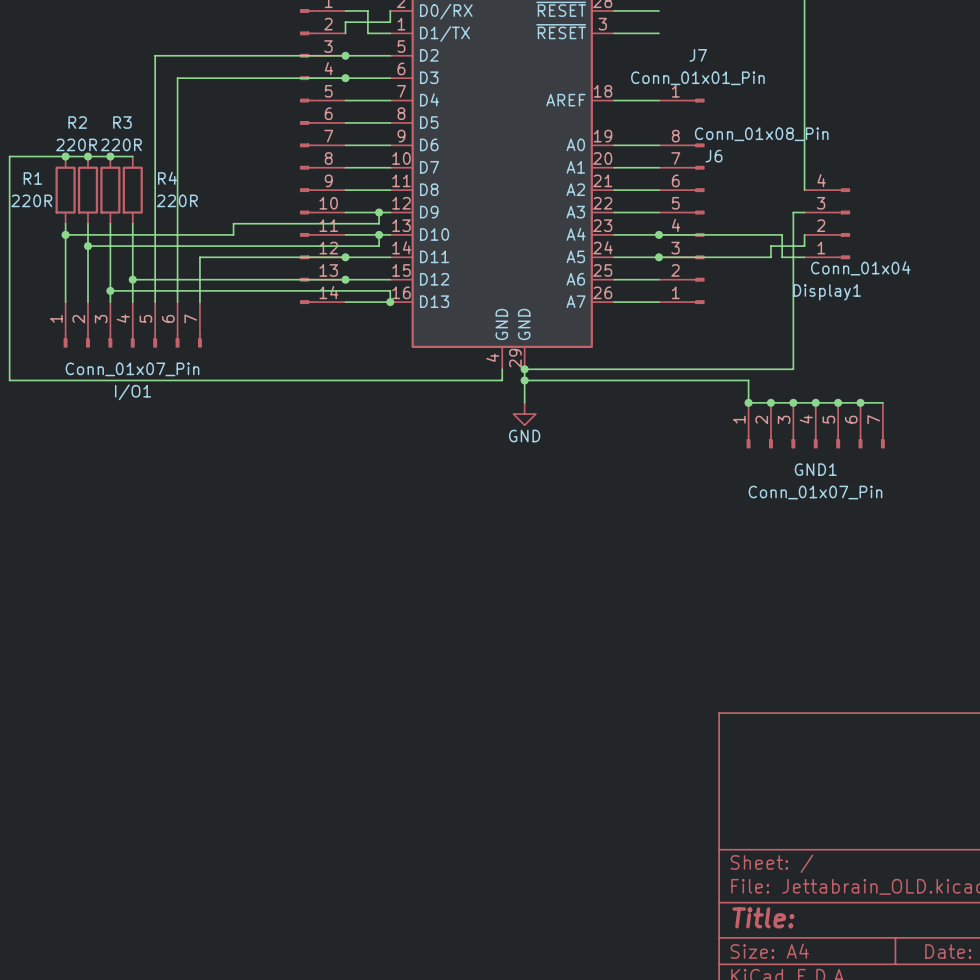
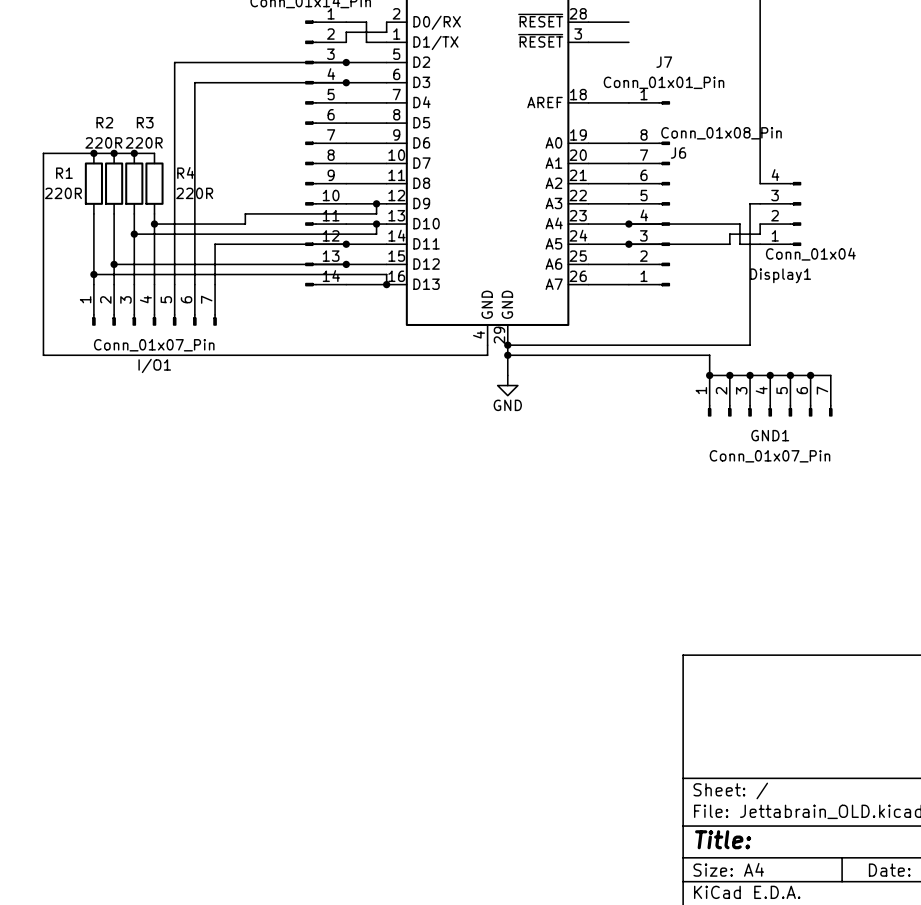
wire: (65, 234) (132, 234) -> none
junction: (65, 234) -> none
junction: none -> (154, 224)
wire: (87, 246) (110, 246) -> none
junction: (87, 246) -> none
junction: none -> (134, 234)
wire: none -> (114, 264) (154, 264)
junction: none -> (114, 264)
junction: (132, 279) -> none
wire: none -> (93, 274) (134, 274)
junction: none -> (93, 274)
junction: (110, 290) -> none

